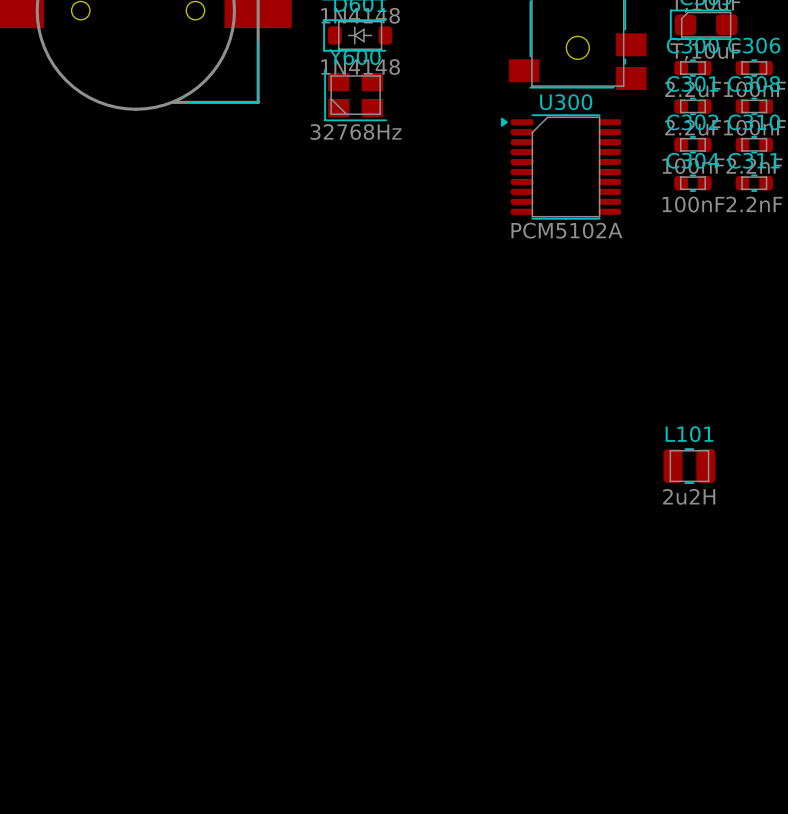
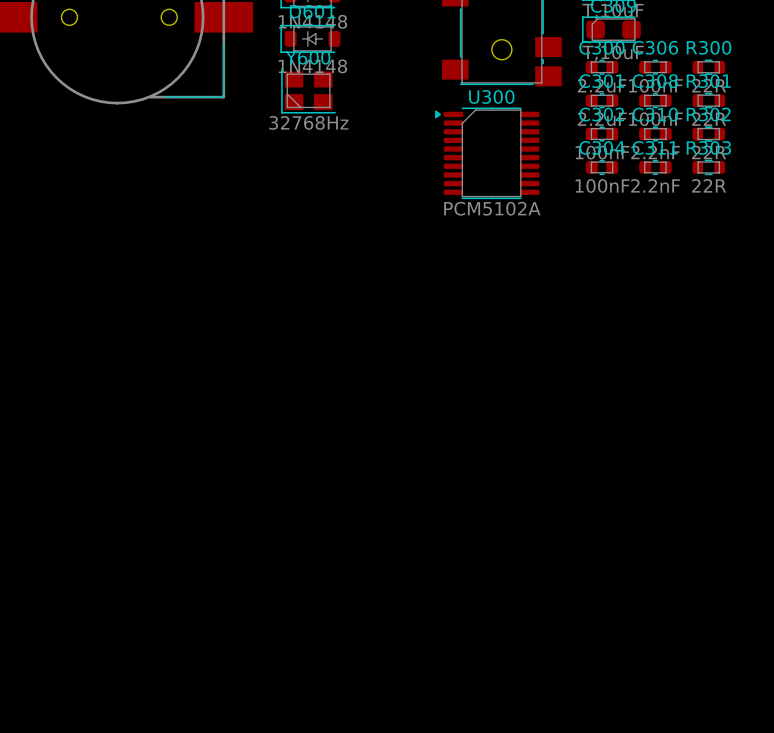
L101: 2u2H (689, 466) -> none

